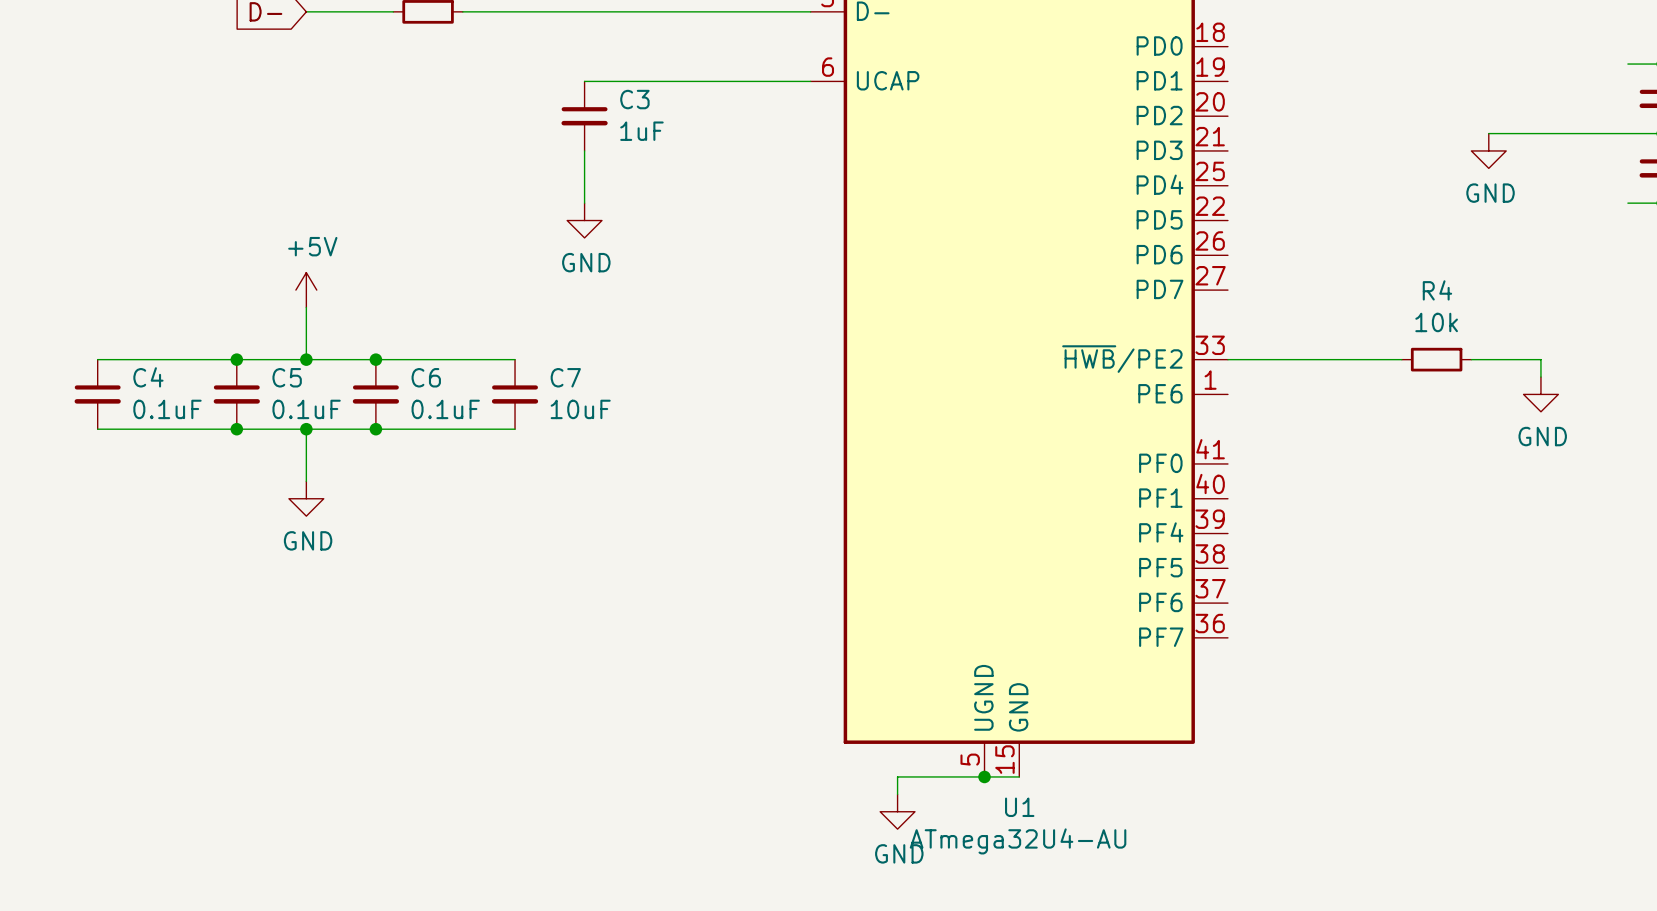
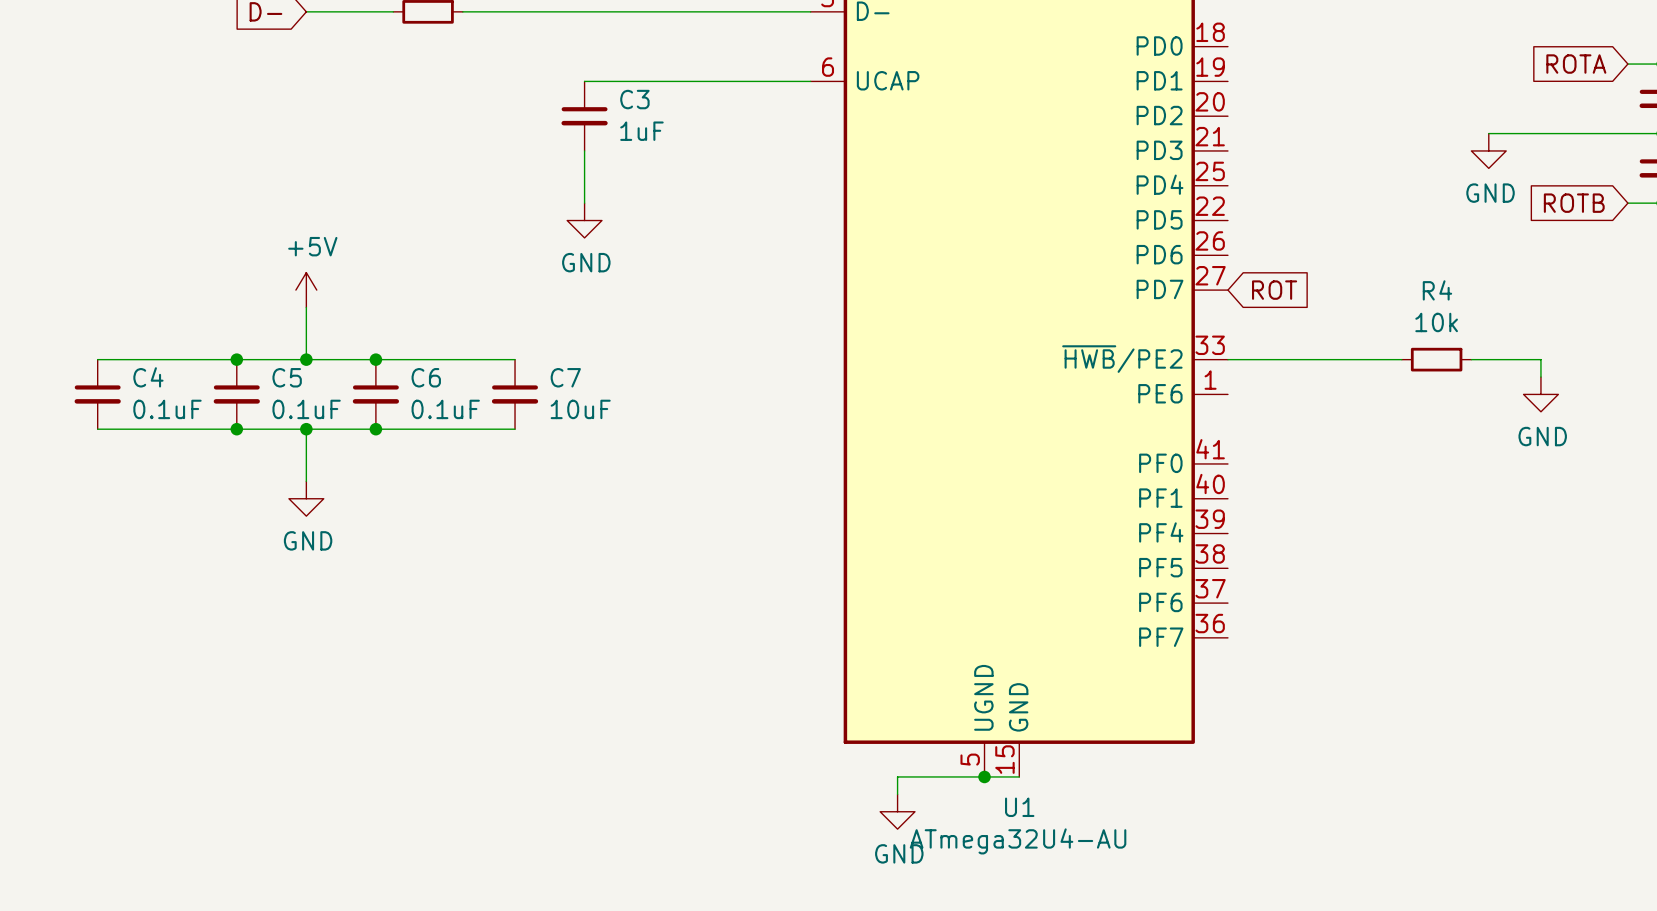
global label: none -> ROTA (1576, 64)
global label: none -> ROTB (1574, 203)
global label: none -> ROT (1274, 290)

